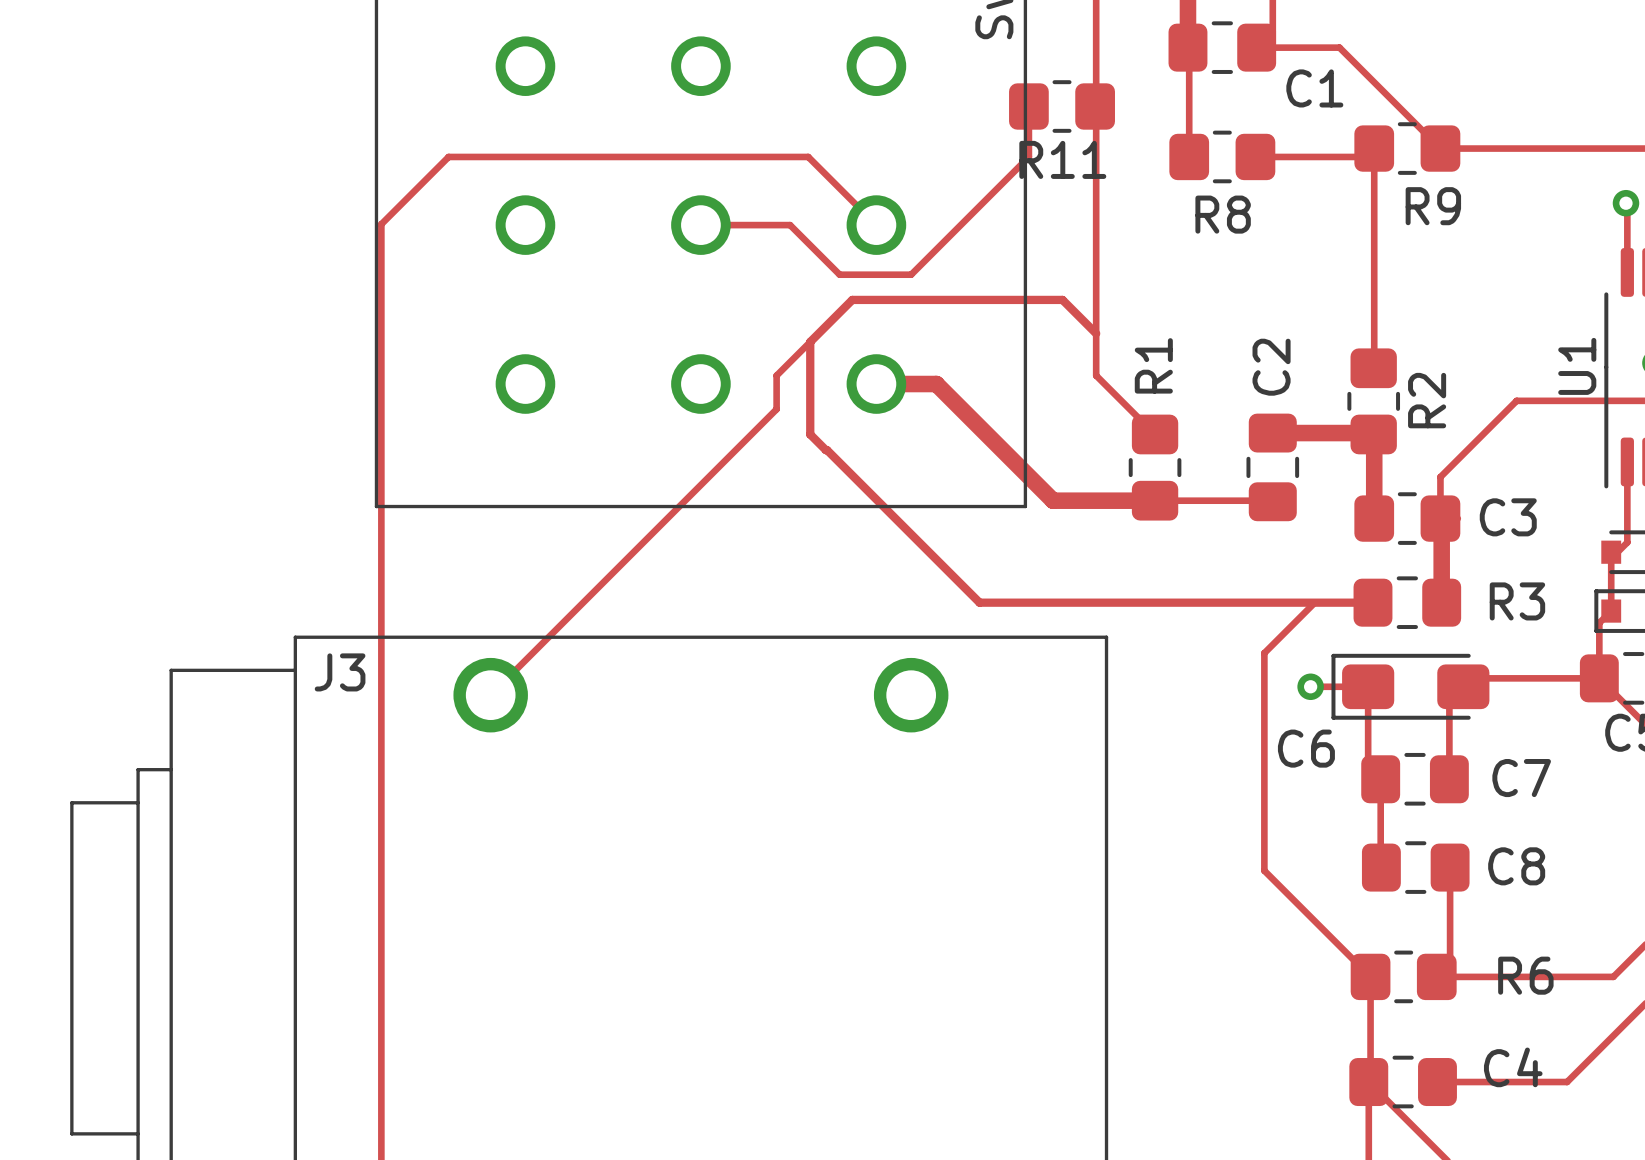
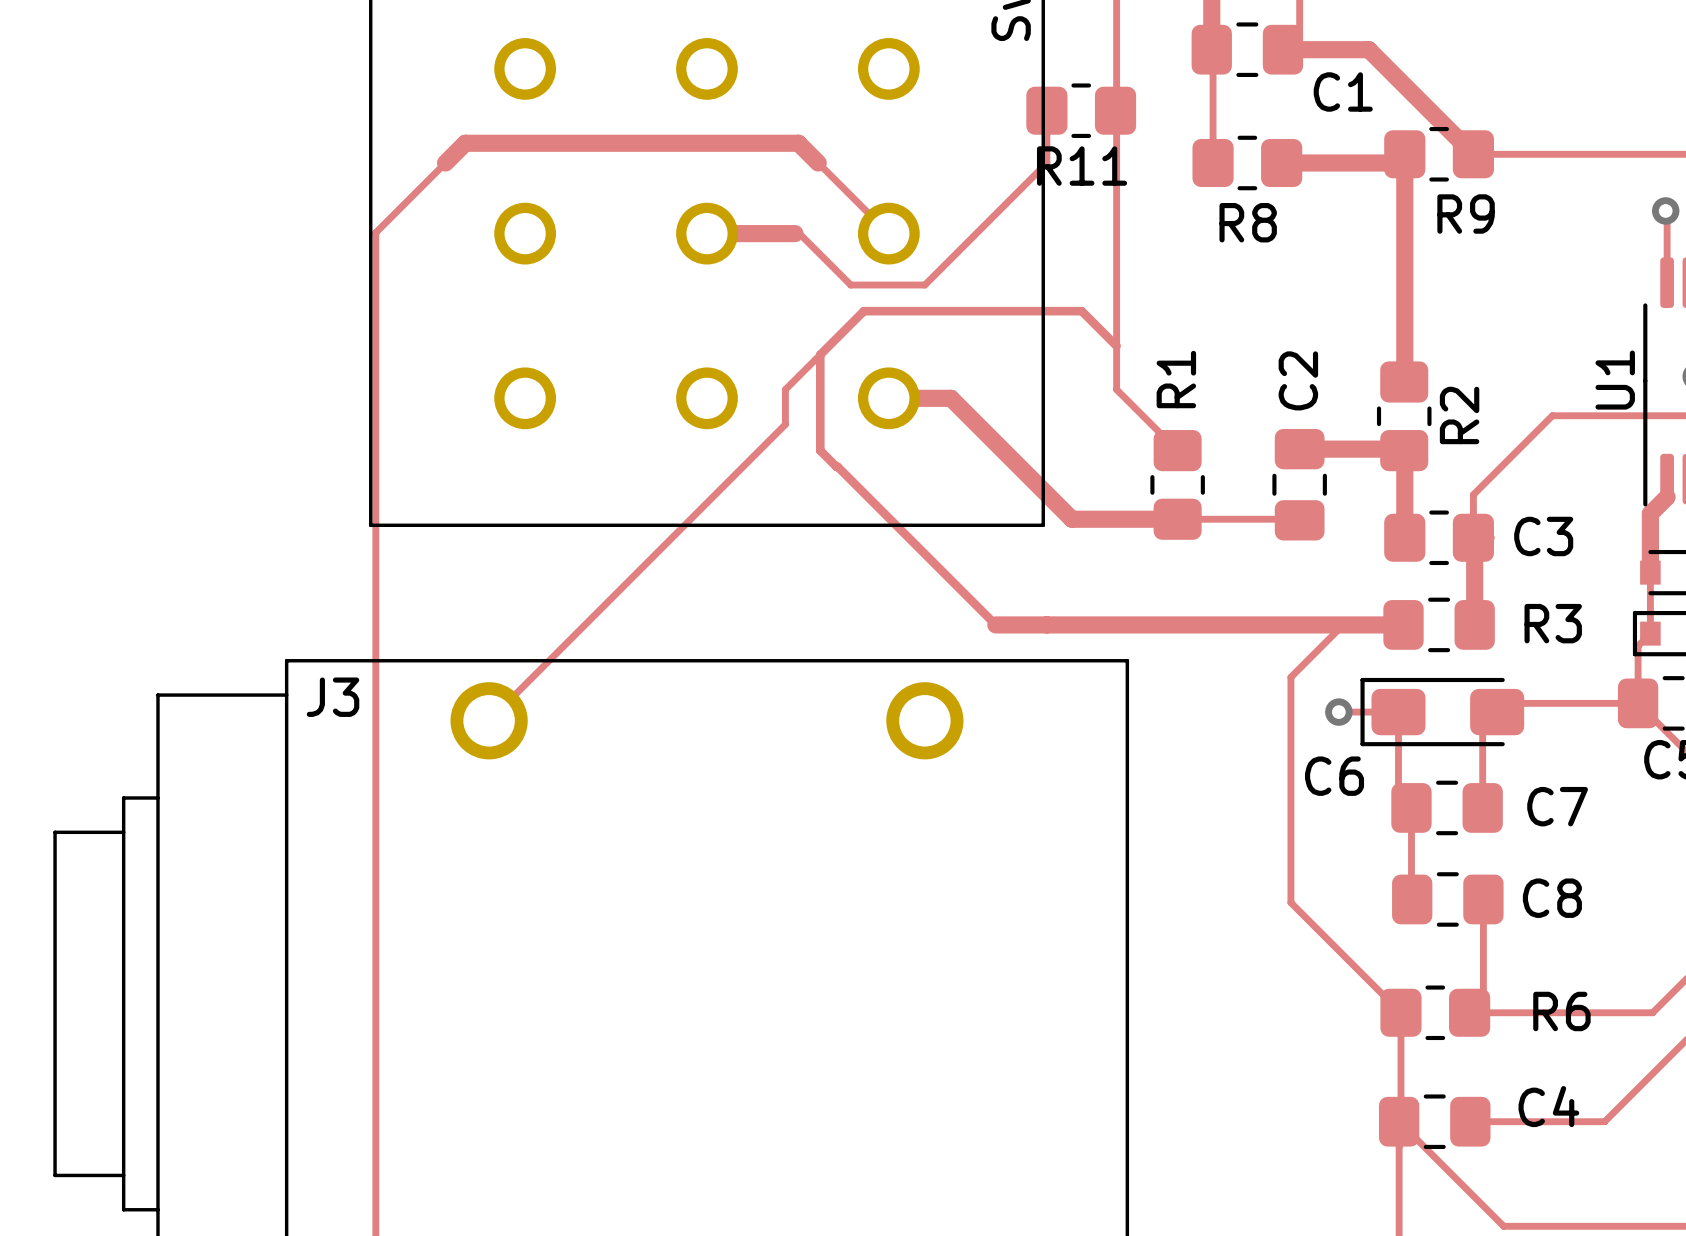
track width: thin (1256, 47) (1339, 47) (1440, 148) -> thick (1282, 49) (1368, 49) (1473, 154)
track: (448, 156) (808, 156) -> (445, 163) (465, 143) (798, 143) (818, 163)
track width: thin (1255, 156) (1365, 156) (1374, 148) (1373, 368) -> thick (1281, 163) (1396, 163) (1404, 154) (1404, 381)
track width: thin (700, 225) (785, 225) -> thick (706, 233) (795, 233)
track: (1627, 479) (1627, 542) (1617, 552) (1611, 552) -> (1667, 497) (1650, 513) (1650, 572)
track width: thin (979, 602) (1372, 602) -> thick (995, 624) (1403, 624)

